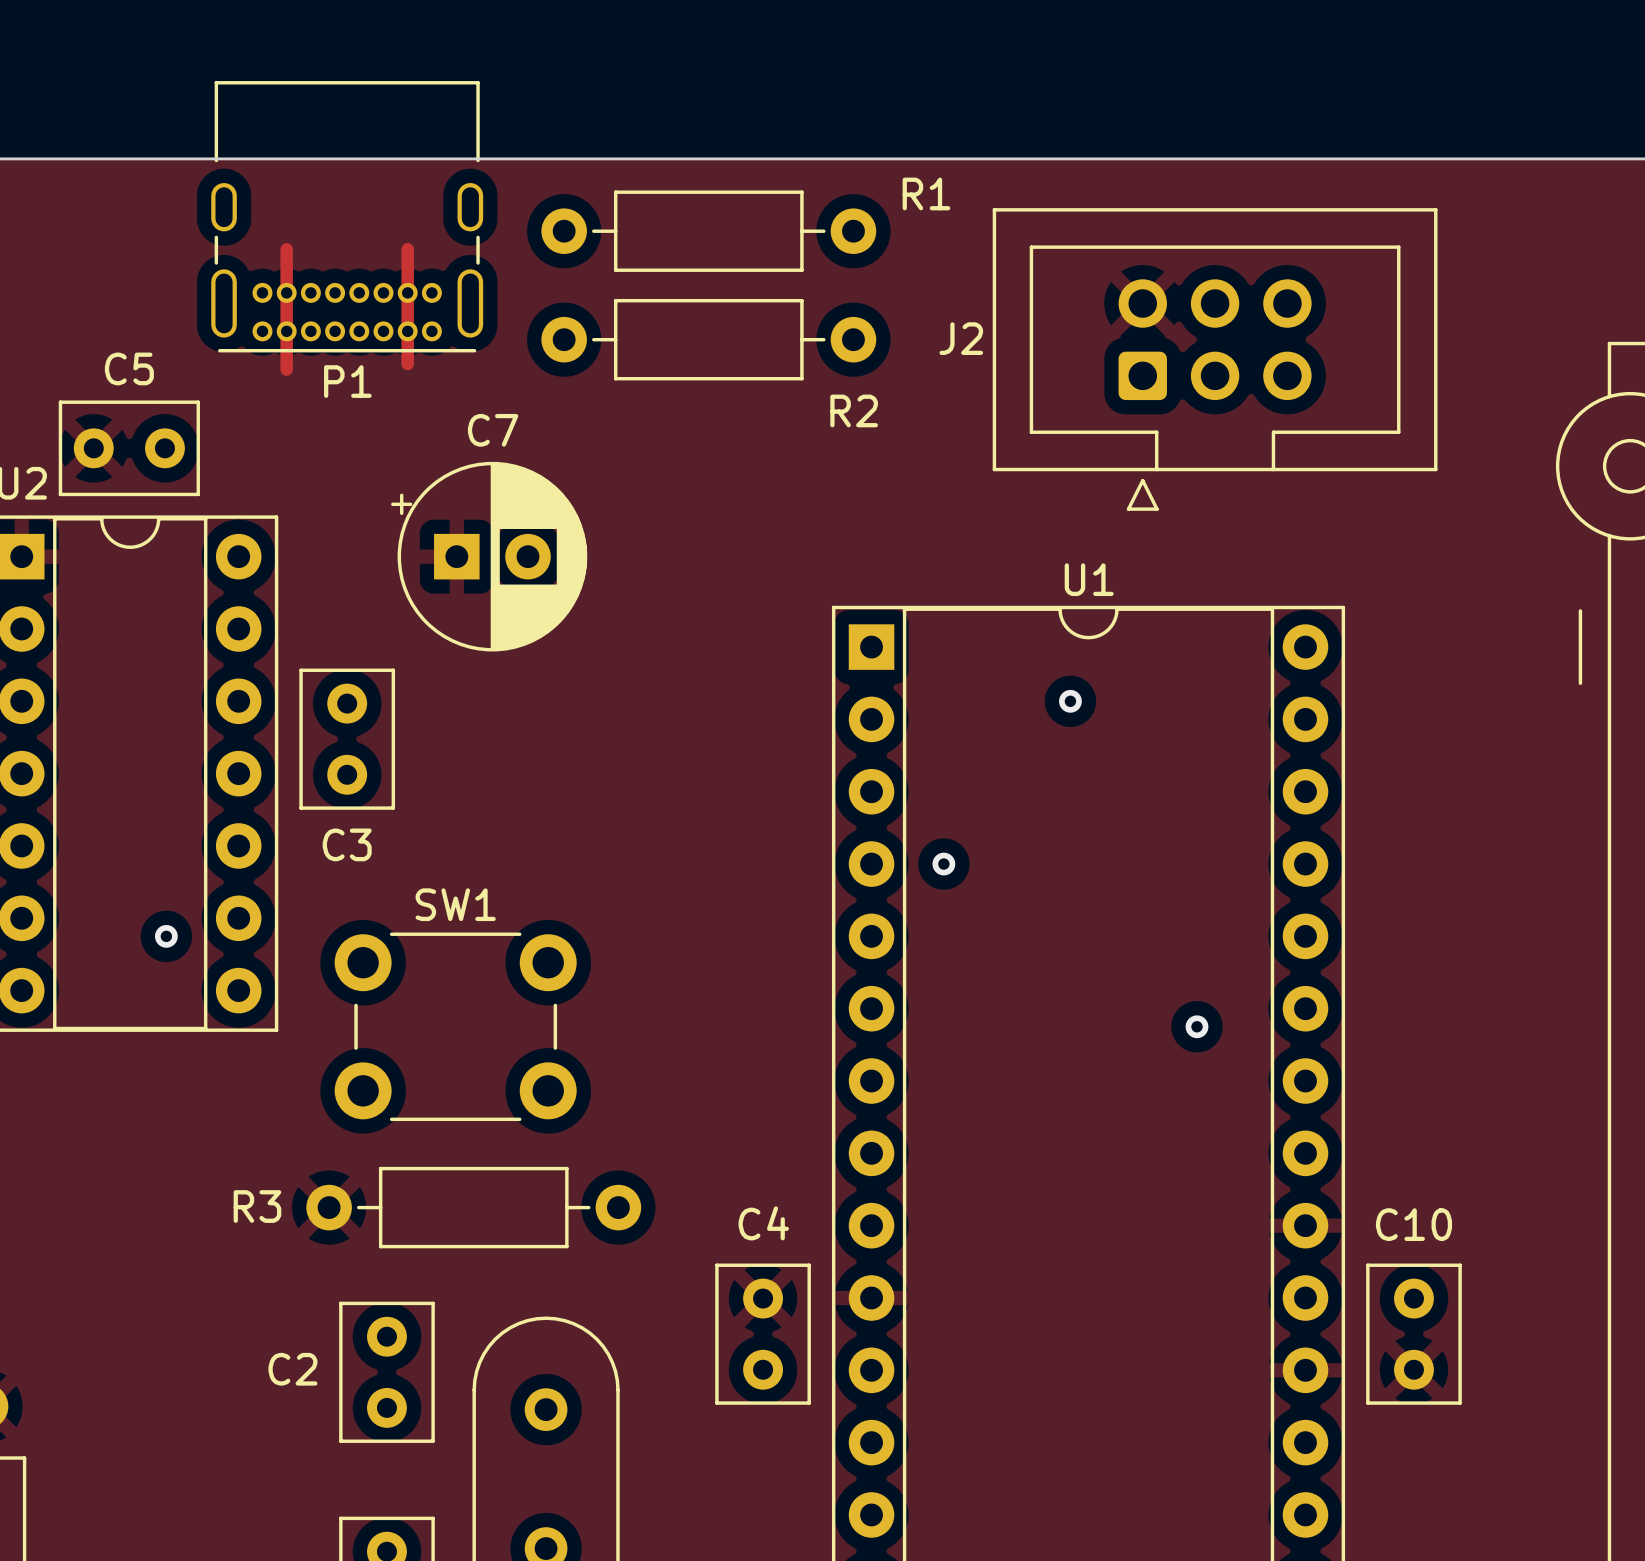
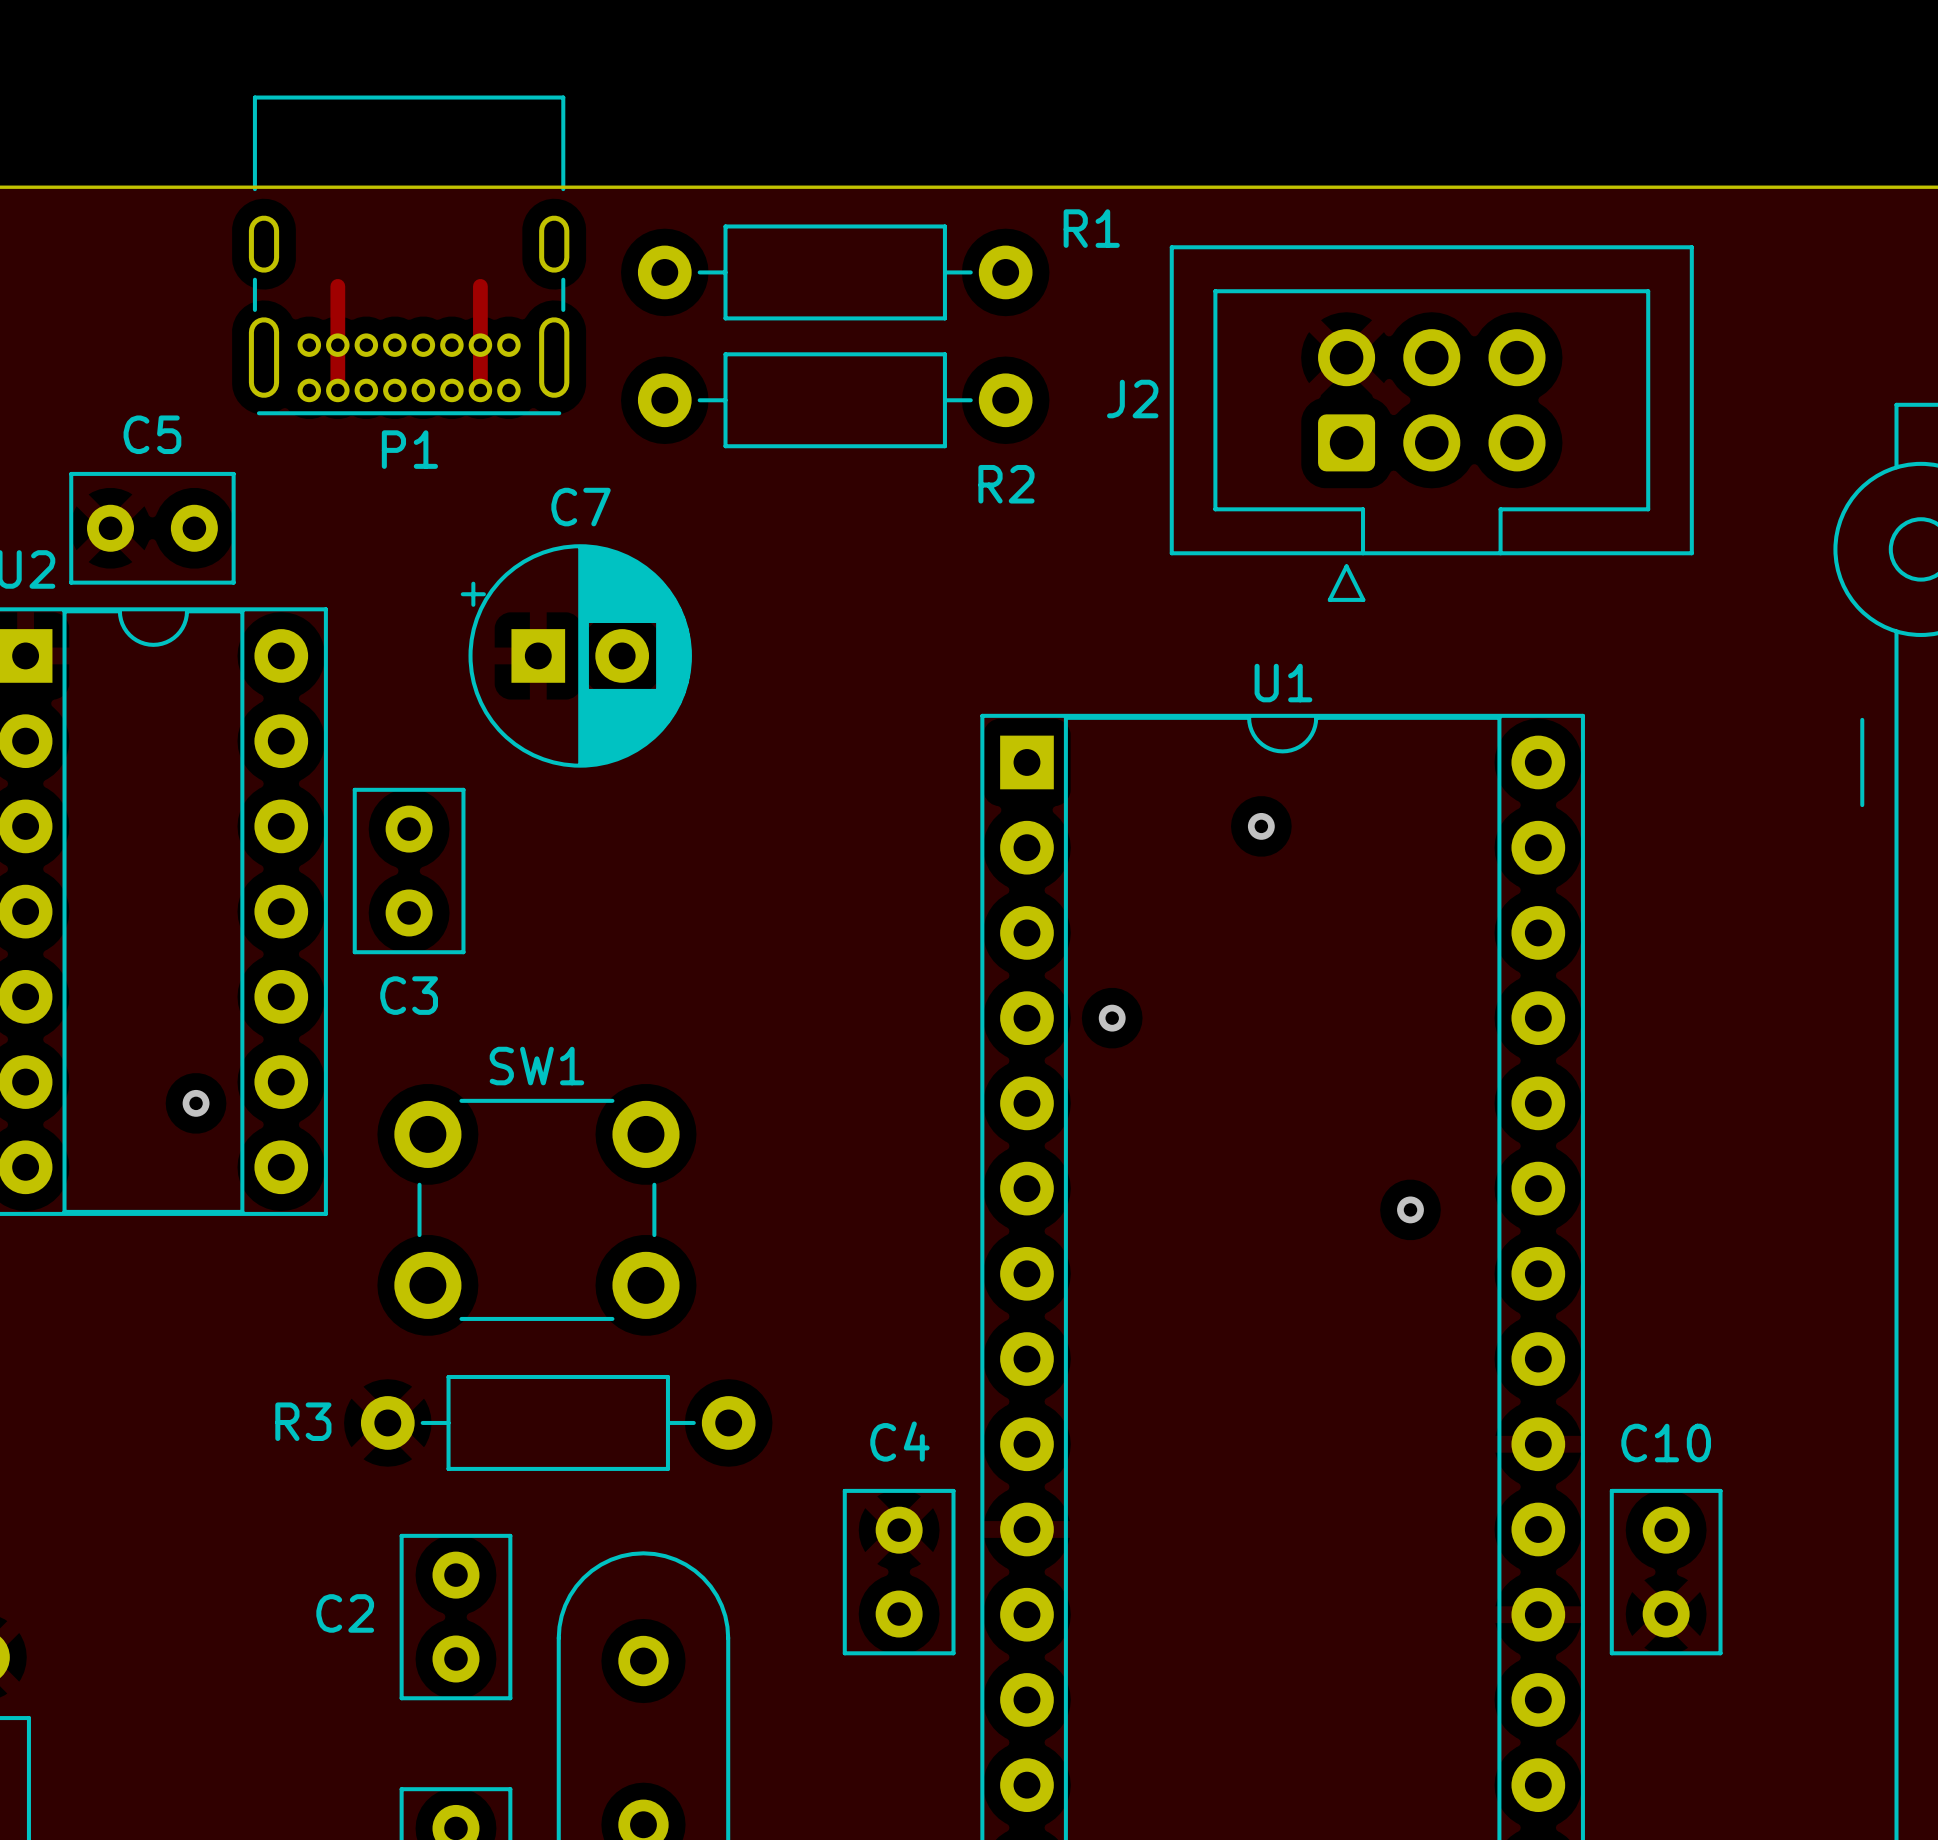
track: none -> (337, 286) (337, 293)
track: none -> (480, 286) (480, 293)
track: (286, 331) (286, 369) -> none
track: (407, 331) (407, 364) -> none

